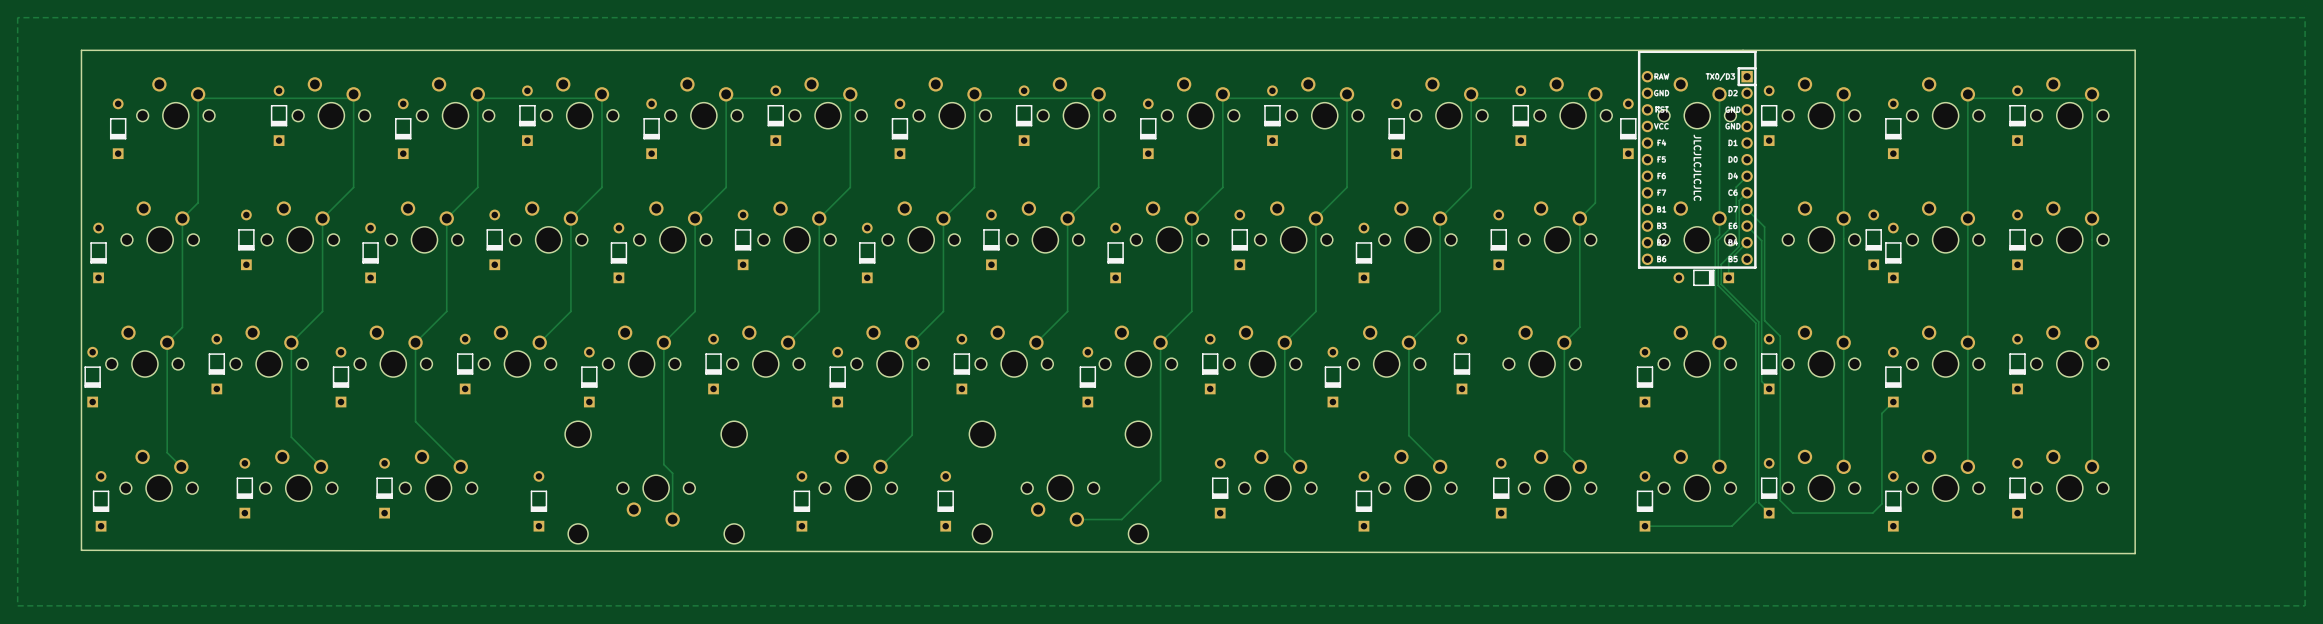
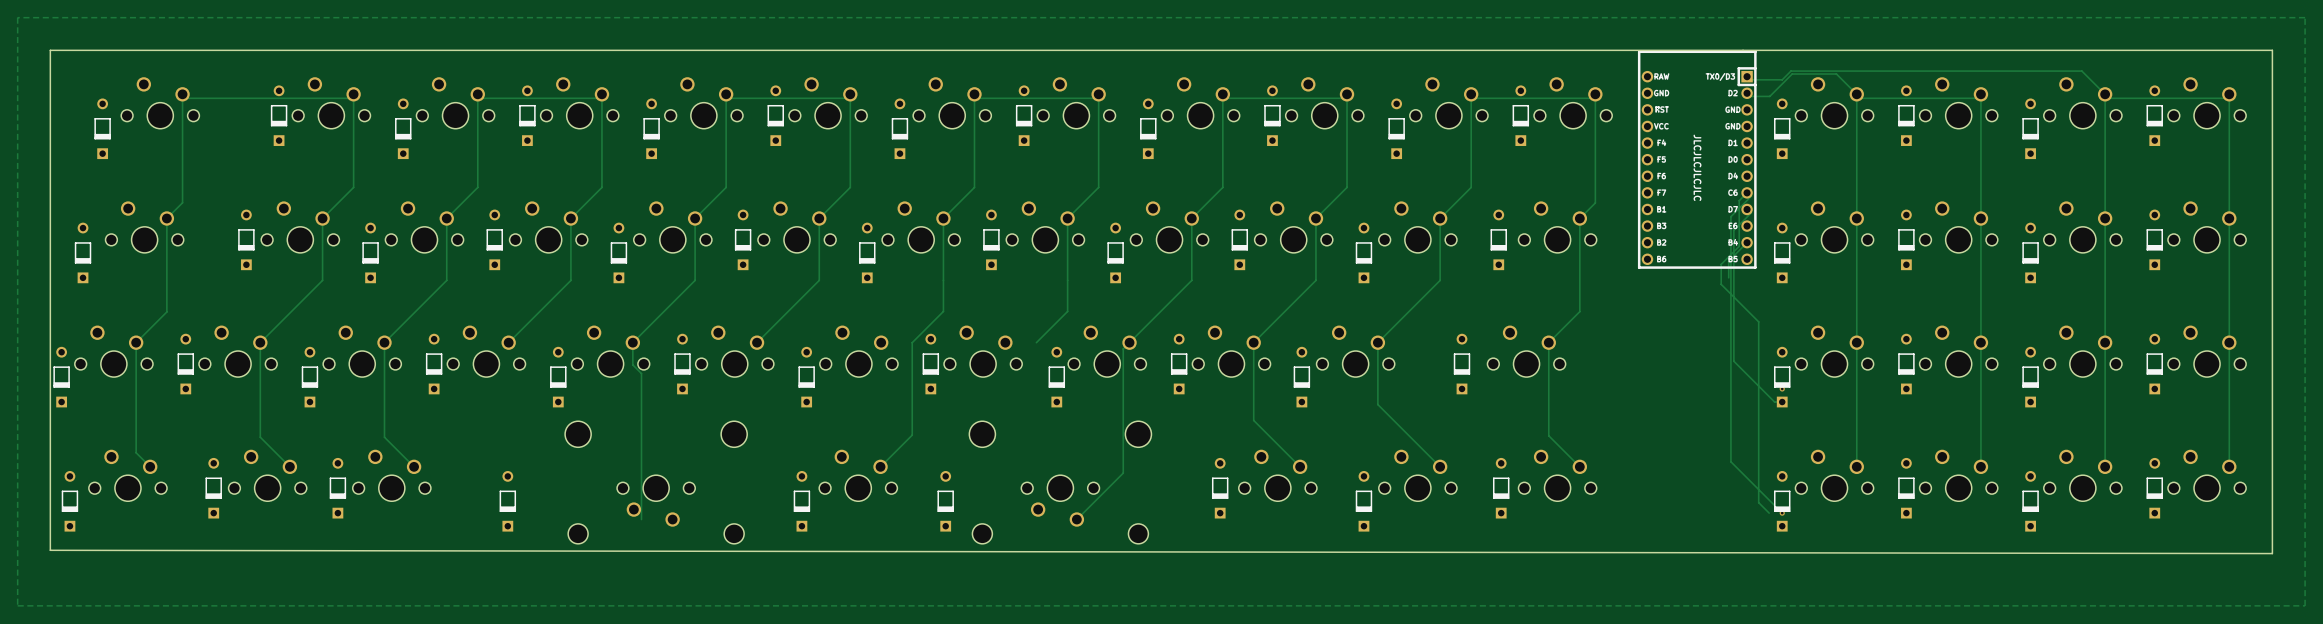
board edge: (2135, 50) (2135, 553) (81, 550) (81, 50) -> (2135, 50) (2272, 50) (2272, 553) (50, 550) (50, 50) (81, 50)
track: none -> (1751, 79) (1782, 79) (1791, 71) (2081, 71) (2109, 98) (2225, 98) (2229, 94) (2229, 466)
track: (1719, 94) (1719, 234) (1715, 239) (1715, 338) (1719, 342) (1719, 466) -> none
track: (1843, 94) (1843, 466) -> (1856, 94) (1856, 466)
track: none -> (2105, 94) (2105, 466)
track: (202, 98) (198, 94) (198, 202) (182, 218) (182, 327) (167, 342) (167, 452) (181, 466) -> (202, 98) (186, 98) (182, 94) (182, 202) (166, 218) (166, 311) (136, 342) (136, 452) (150, 466)
track: (1971, 98) (1967, 94) (1967, 466) -> (1971, 98) (1860, 98) (1836, 74) (1792, 74) (1769, 96) (1751, 96)
track: (1976, 98) (2088, 98) (2092, 94) (2092, 466) -> (1976, 98) (1980, 94) (1980, 466)
part position: (175, 102) -> (160, 102)
part: (1697, 102) -> none
part position: (1821, 102) -> (1834, 102)
part position: (1945, 102) -> (1958, 102)
part position: (2069, 102) -> (2082, 102)
part: none -> (2207, 102)
part position: (1769, 115) -> (1782, 128)
part position: (2017, 115) -> (2030, 128)
part: none -> (2154, 115)
part position: (118, 128) -> (102, 128)
part: (1628, 128) -> none
part position: (1893, 128) -> (1906, 115)
track: (1747, 176) (1736, 187) (1736, 222) (1718, 240) (1718, 285) (1755, 323) (1755, 502) (1731, 526) (1644, 526) -> none
track: none -> (1751, 196) (1730, 216) (1730, 461) (1782, 513)
track: (1747, 209) (1764, 226) (1764, 320) (1780, 336) (1780, 500) (1792, 513) (1872, 513) (1881, 503) (1881, 413) (1893, 402) -> none
track: none -> (1751, 212) (1733, 230) (1733, 361) (1774, 402) (1782, 402)
track: (1747, 226) (1761, 240) (1761, 381) (1769, 388) -> none
part position: (160, 227) -> (144, 227)
part: (1697, 227) -> none
part position: (1821, 227) -> (1834, 227)
part position: (1945, 227) -> (1958, 227)
part position: (2069, 227) -> (2082, 227)
part: none -> (2207, 227)
part: (1873, 239) -> none
part: none -> (1906, 239)
part position: (2017, 239) -> (2030, 252)
part: none -> (2154, 239)
part position: (98, 252) -> (83, 252)
part: none -> (1782, 252)
part: (1893, 252) -> none
part: (1703, 277) -> none
track: (322, 280) (322, 311) (291, 342) (291, 437) (321, 466) -> (322, 280) (260, 342) (260, 437) (289, 466)
track: (446, 280) (446, 311) (415, 342) (415, 421) (460, 466) -> (446, 280) (384, 342) (384, 437) (414, 466)
track: (570, 280) (570, 311) (539, 342) -> (570, 280) (508, 342)
track: (695, 280) (695, 311) (663, 342) (663, 464) (672, 473) (672, 519) -> (695, 280) (632, 342) (632, 364) (641, 373) (641, 519)
track: (819, 280) (819, 311) (788, 342) -> (819, 280) (757, 342)
track: (1191, 280) (1191, 311) (1160, 342) (1160, 480) (1121, 519) (1076, 519) -> (1191, 280) (1123, 348) (1123, 473) (1076, 519)
track: (1315, 280) (1315, 311) (1284, 342) (1284, 451) -> (1315, 280) (1253, 342) (1253, 420) (1284, 451)
track: (1440, 280) (1440, 311) (1408, 342) (1408, 435) -> (1440, 280) (1377, 342) (1377, 404) (1408, 435)
track: (1579, 311) (1579, 327) (1564, 342) (1564, 451) -> (1579, 311) (1548, 342) (1548, 435) (1564, 451)
part position: (144, 351) -> (113, 351)
part position: (269, 351) -> (238, 351)
part position: (393, 351) -> (362, 351)
part position: (517, 351) -> (486, 351)
part position: (641, 351) -> (610, 351)
part position: (765, 351) -> (734, 351)
part position: (889, 351) -> (858, 351)
part position: (1014, 351) -> (983, 351)
part position: (1138, 351) -> (1107, 351)
part position: (1262, 351) -> (1231, 351)
part position: (1386, 351) -> (1355, 351)
part position: (1542, 351) -> (1526, 351)
part: (1697, 351) -> none
part position: (1821, 351) -> (1834, 351)
part position: (1945, 351) -> (1958, 351)
part position: (2069, 351) -> (2082, 351)
part: none -> (2207, 351)
part position: (216, 364) -> (185, 364)
part position: (465, 364) -> (434, 364)
part position: (713, 364) -> (682, 364)
part position: (961, 364) -> (930, 364)
part position: (1210, 364) -> (1179, 364)
part position: (1769, 364) -> (1782, 377)
part position: (2017, 364) -> (2030, 377)
part: none -> (2154, 364)
part position: (92, 377) -> (61, 377)
part position: (341, 377) -> (309, 377)
part position: (589, 377) -> (558, 377)
part position: (837, 377) -> (806, 377)
part position: (1087, 377) -> (1056, 377)
part position: (1332, 377) -> (1301, 377)
part: (1644, 377) -> none
part position: (1893, 377) -> (1906, 364)
via: none -> (1782, 388)
part position: (159, 475) -> (127, 475)
part position: (298, 475) -> (267, 475)
part: none -> (391, 475)
part: (438, 475) -> none
part: (1697, 475) -> none
part position: (1821, 475) -> (1834, 475)
part position: (1945, 475) -> (1958, 475)
part position: (2069, 475) -> (2082, 475)
part: none -> (2207, 475)
part position: (244, 488) -> (213, 488)
part: none -> (337, 488)
part: (384, 488) -> none
part position: (1769, 488) -> (1782, 501)
part position: (2017, 488) -> (2030, 501)
part: none -> (2154, 488)
part position: (101, 501) -> (69, 501)
part position: (538, 501) -> (507, 501)
part: (1644, 501) -> none
part position: (1893, 501) -> (1906, 488)
via: none -> (1782, 513)

